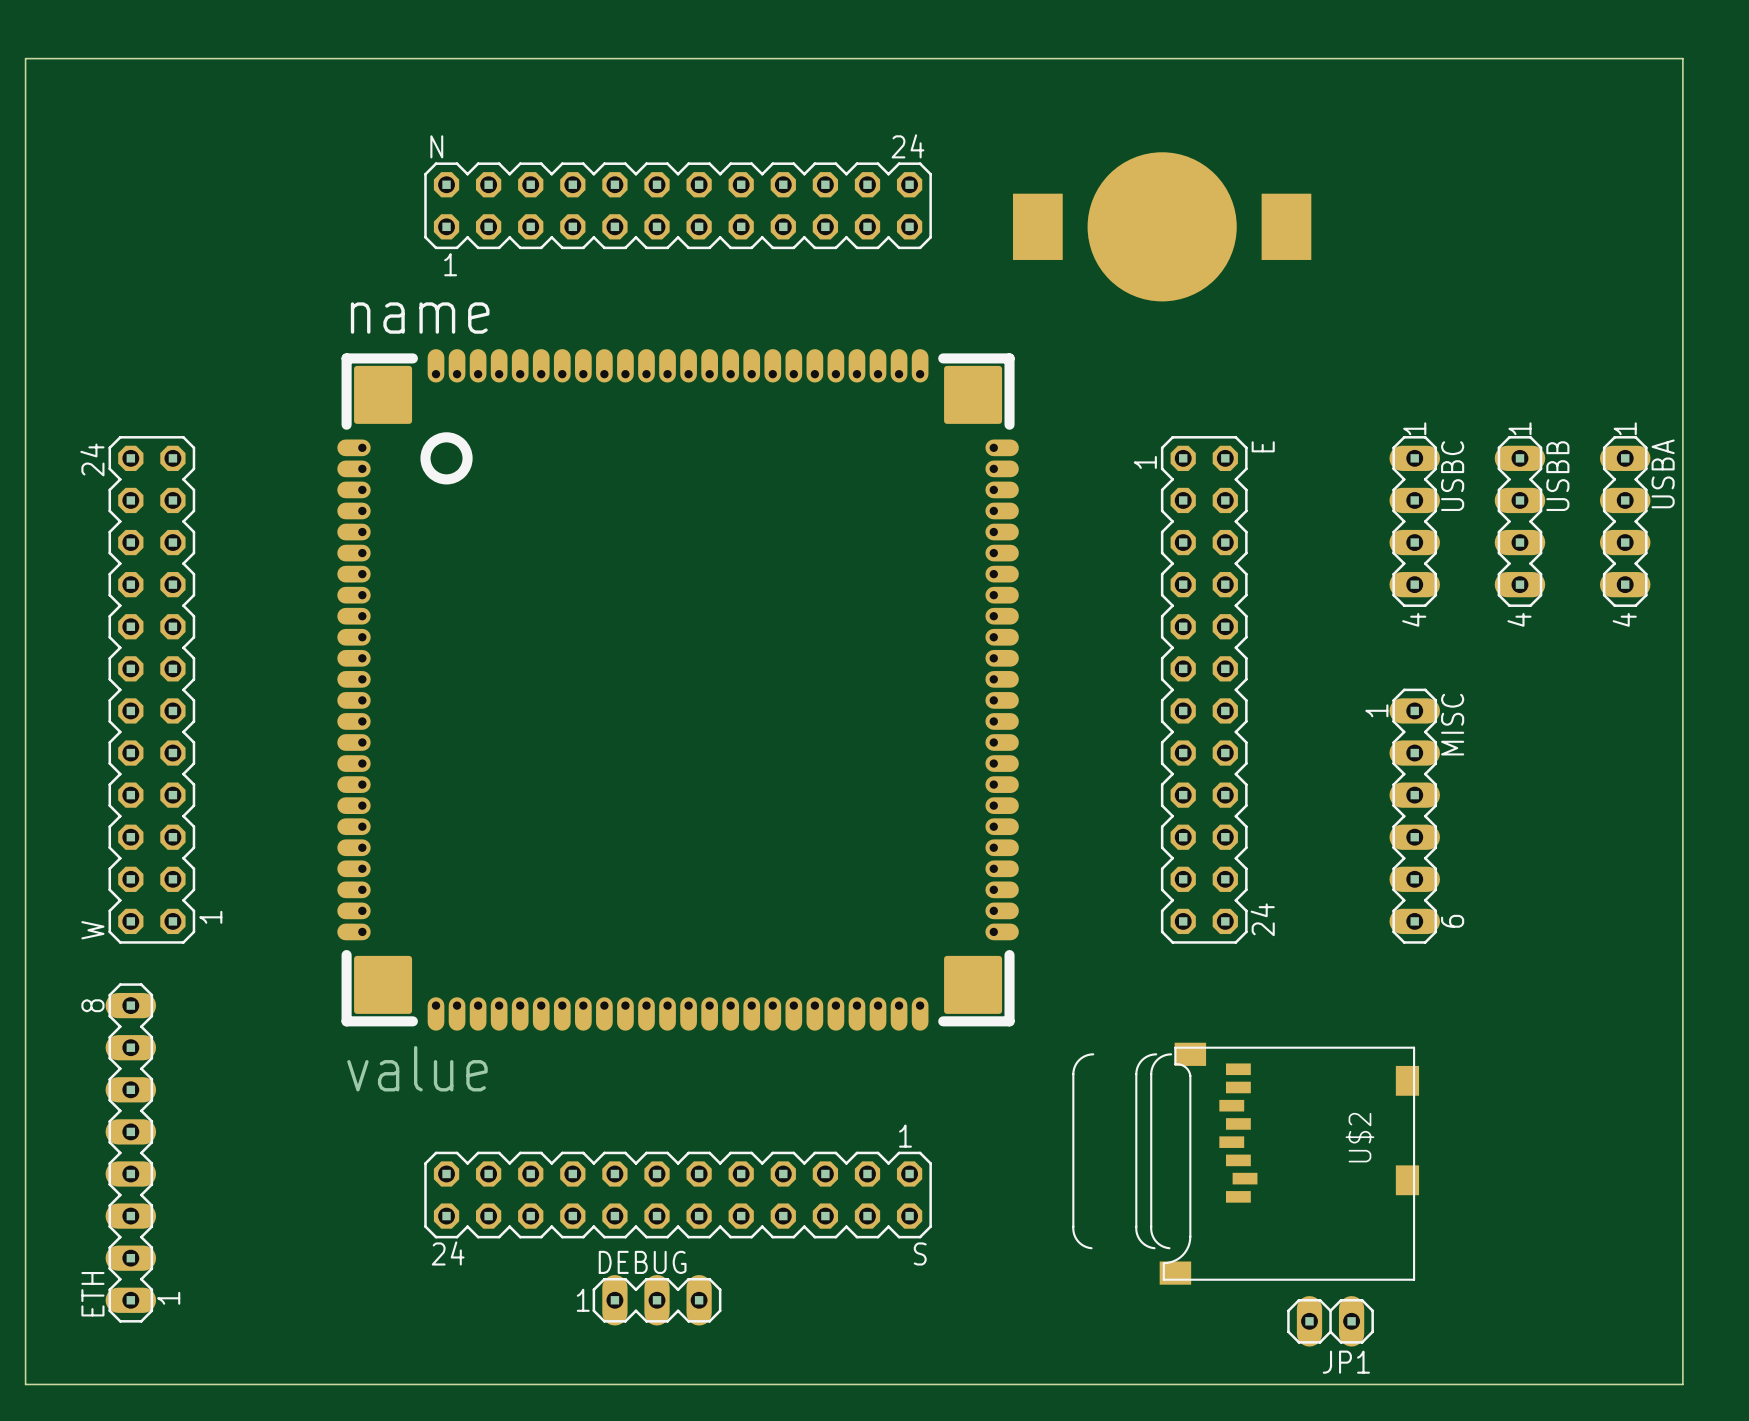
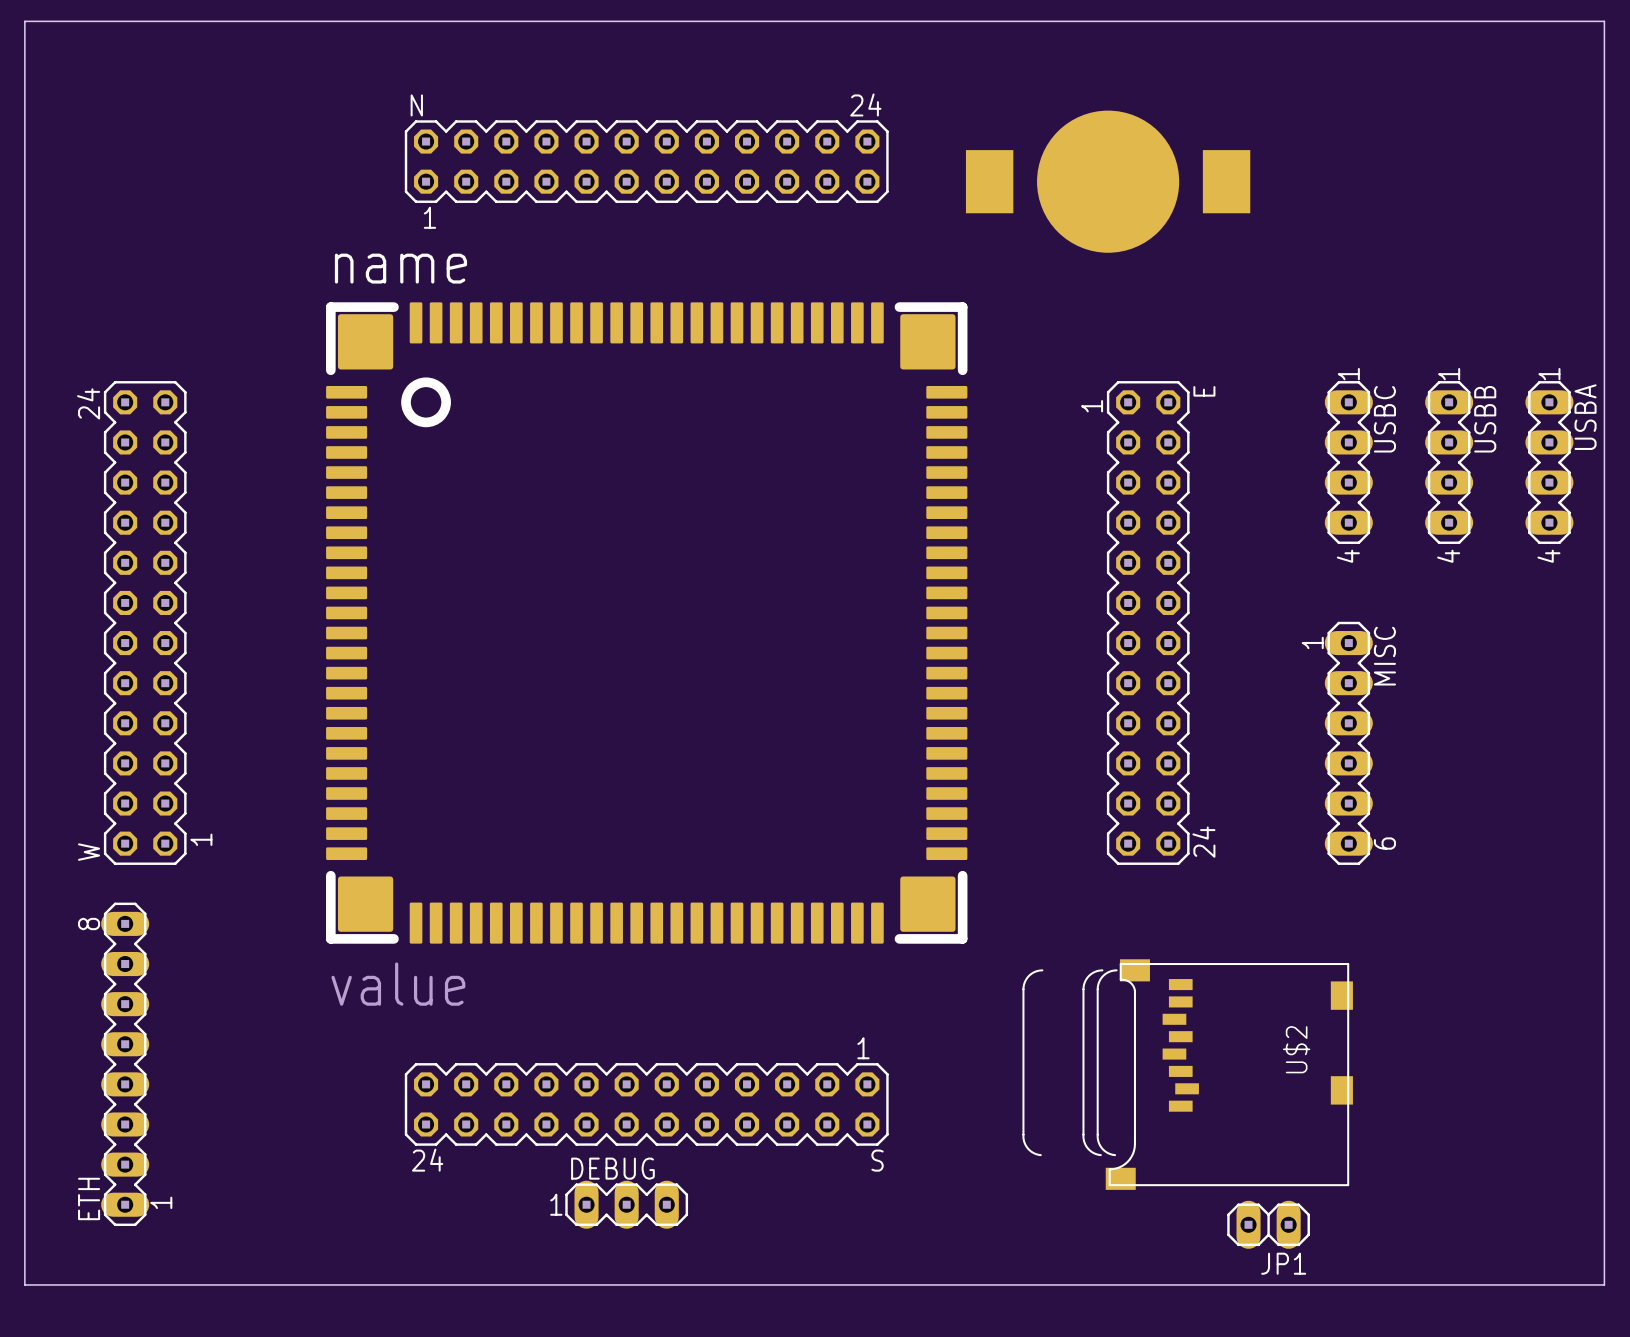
part footprint: [337, 349, 1019, 1031] -> [326, 302, 968, 944]

